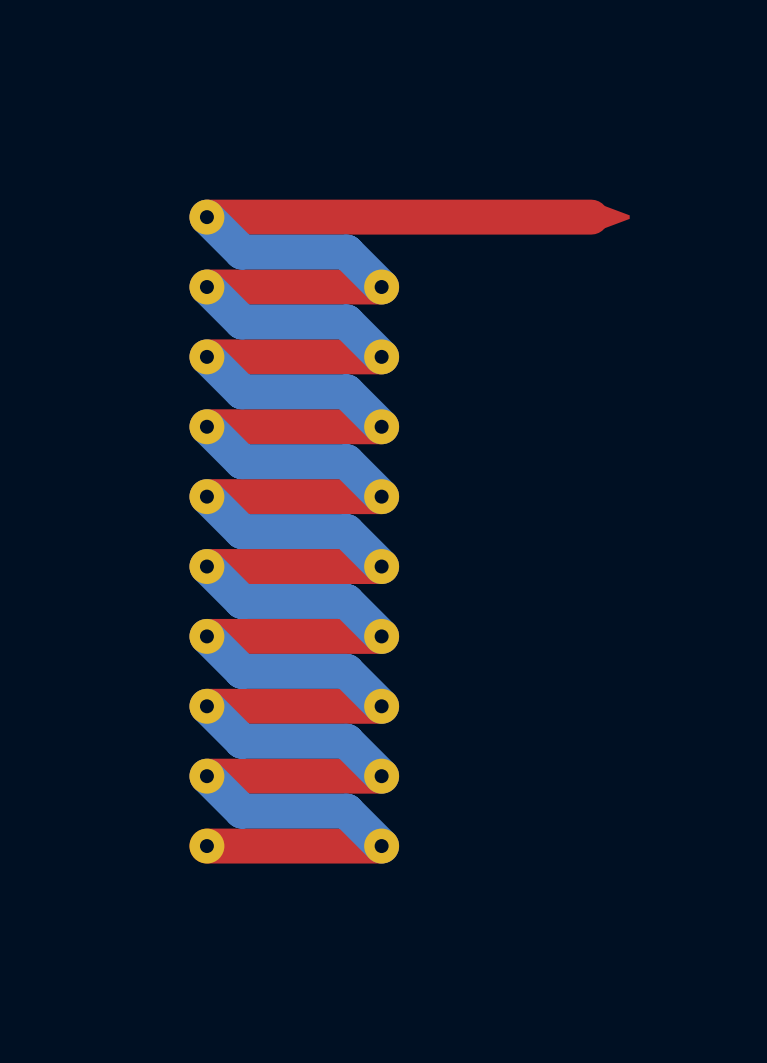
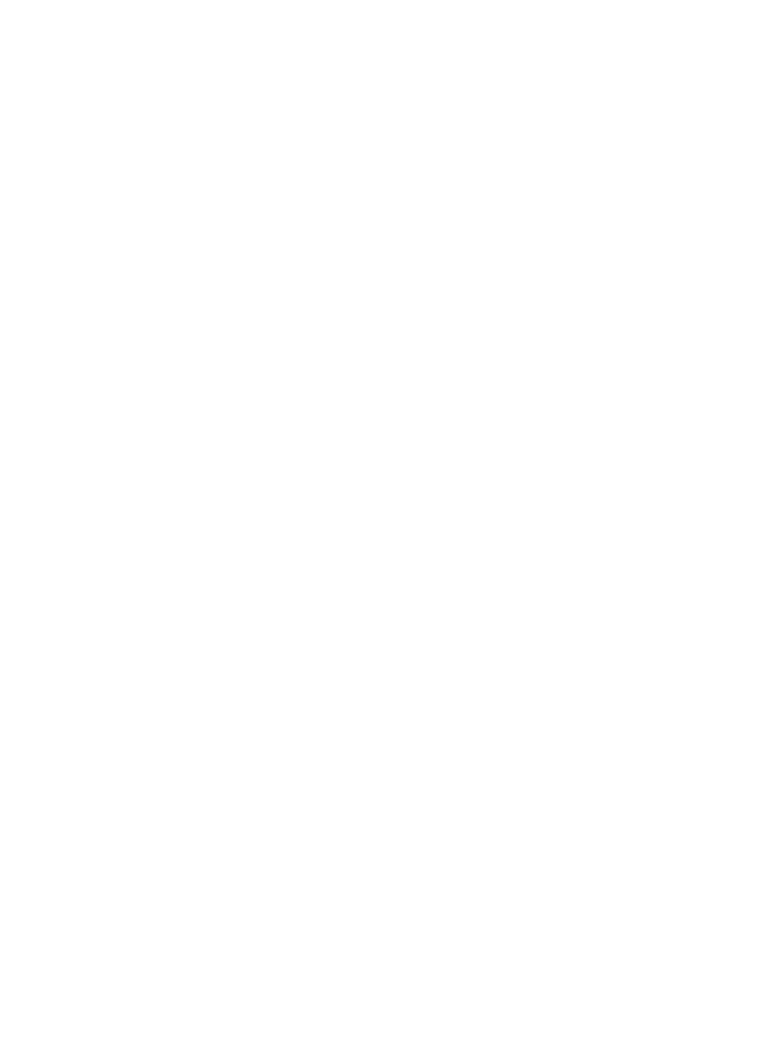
part: (409, 531) -> none

